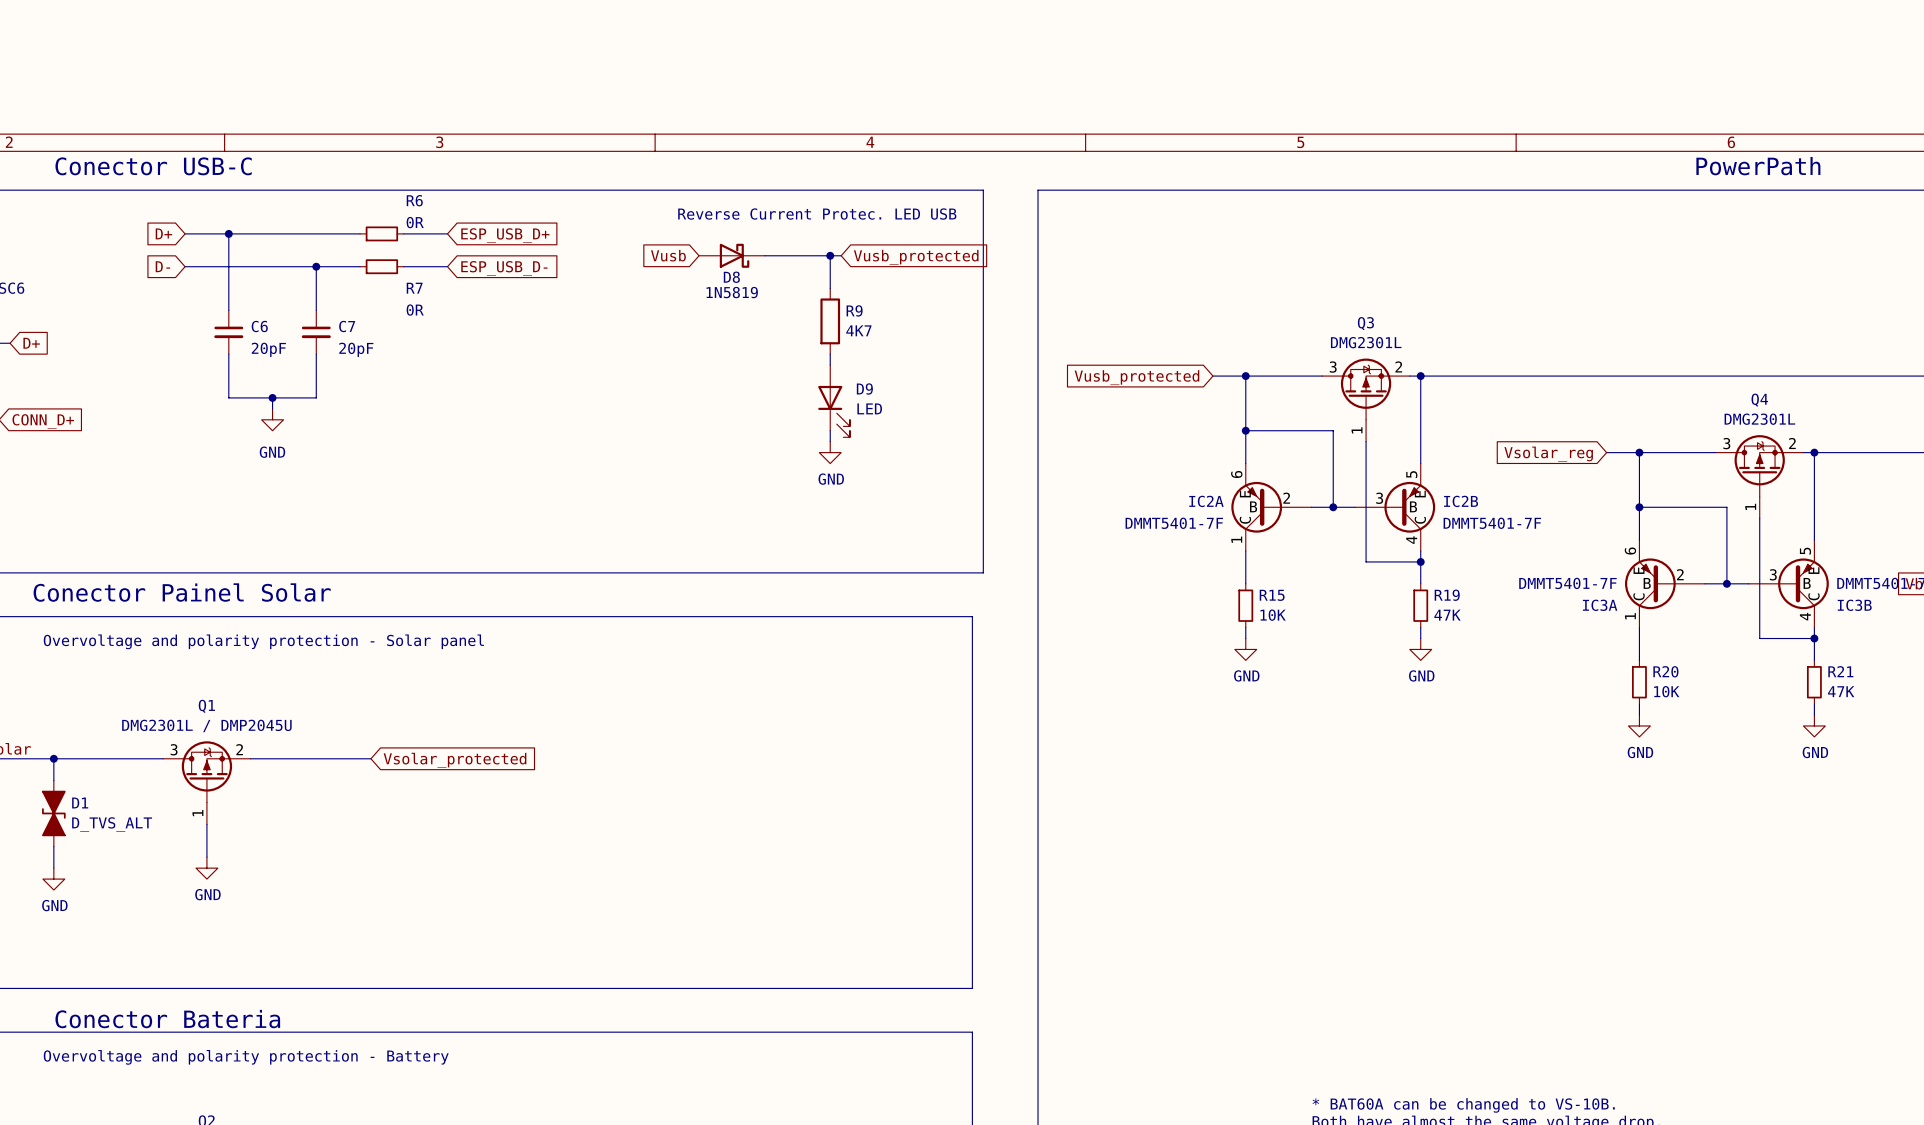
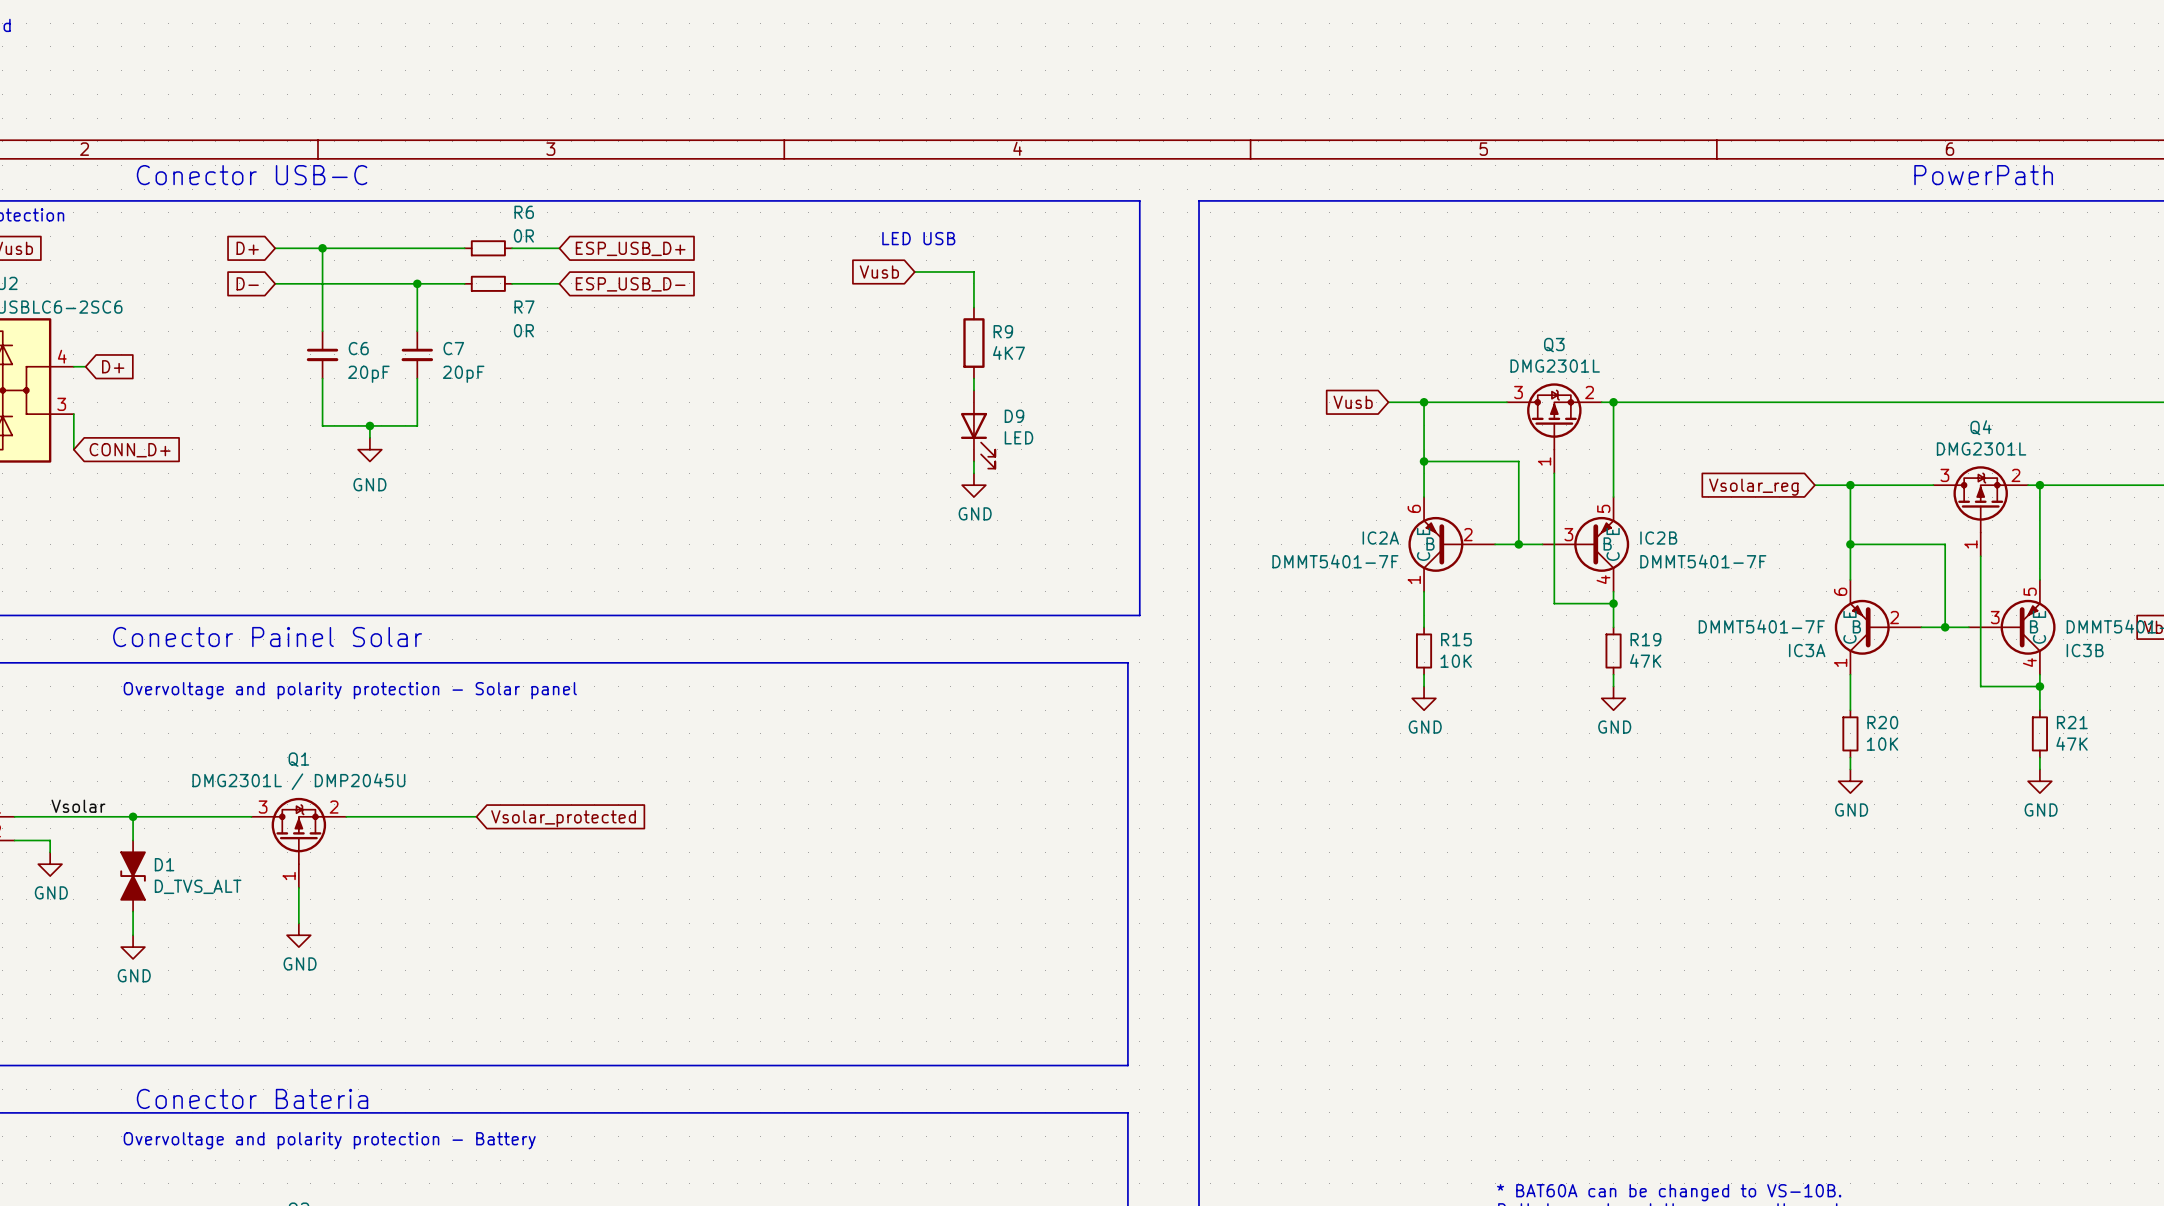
text: Reverse Current Protec. LED USB (817, 214) -> none
text: none -> LED USB (918, 238)
global label position: Vusb (668, 255) -> Vusb (879, 271)
D8: 1N5819 (731, 255) -> none
wire: (764, 255) (775, 255) -> none
wire: (830, 255) (841, 255) -> none
junction: (830, 255) -> none
global label: Vusb_protected (916, 257) -> none
global label: Vusb_protected (1136, 377) -> Vusb (1353, 402)

